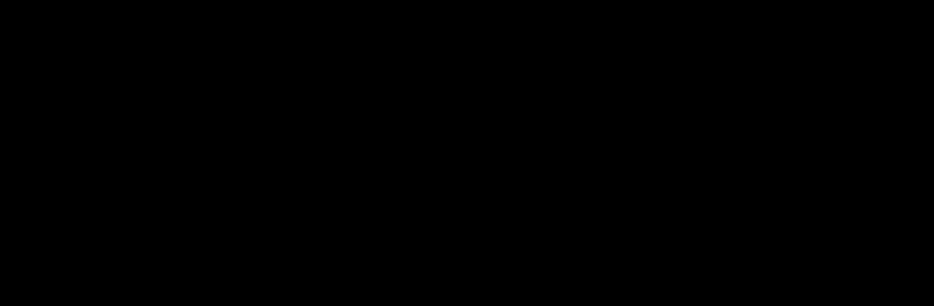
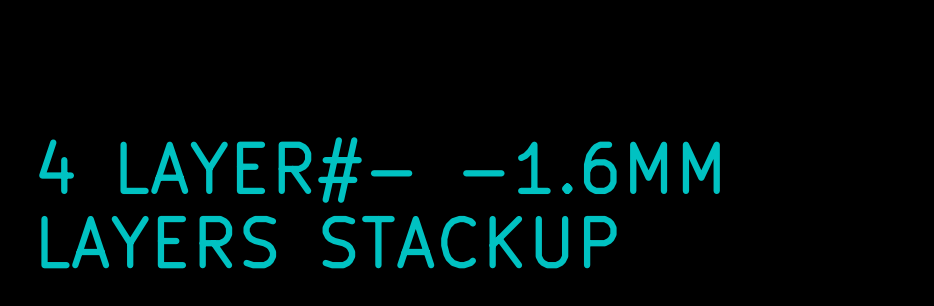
text: none -> 4 LAYER#- -1.6MM (379, 170)
text: none -> LAYERS STACKUP (328, 242)

